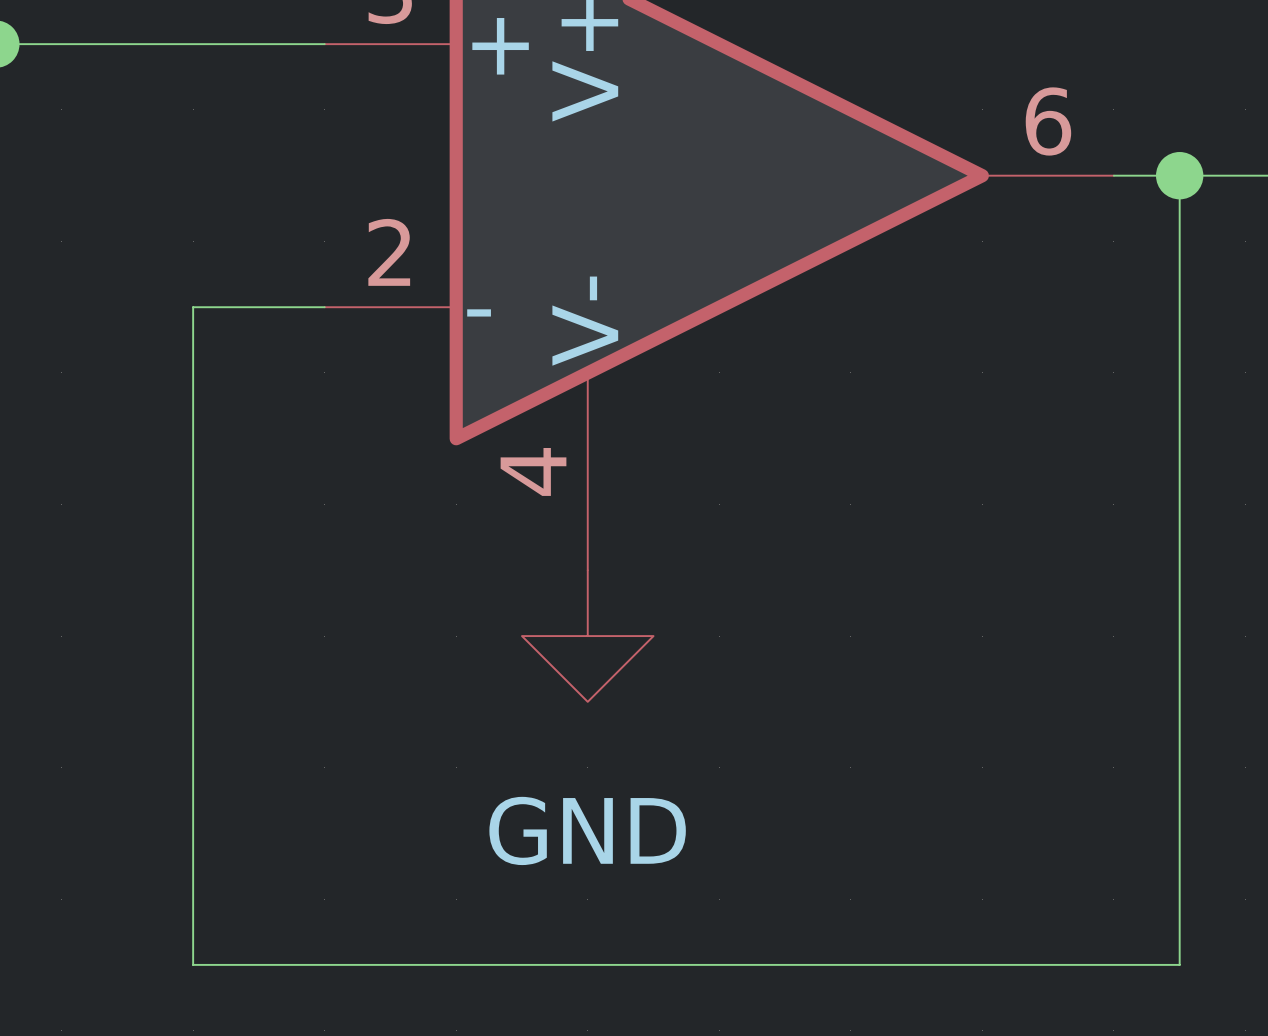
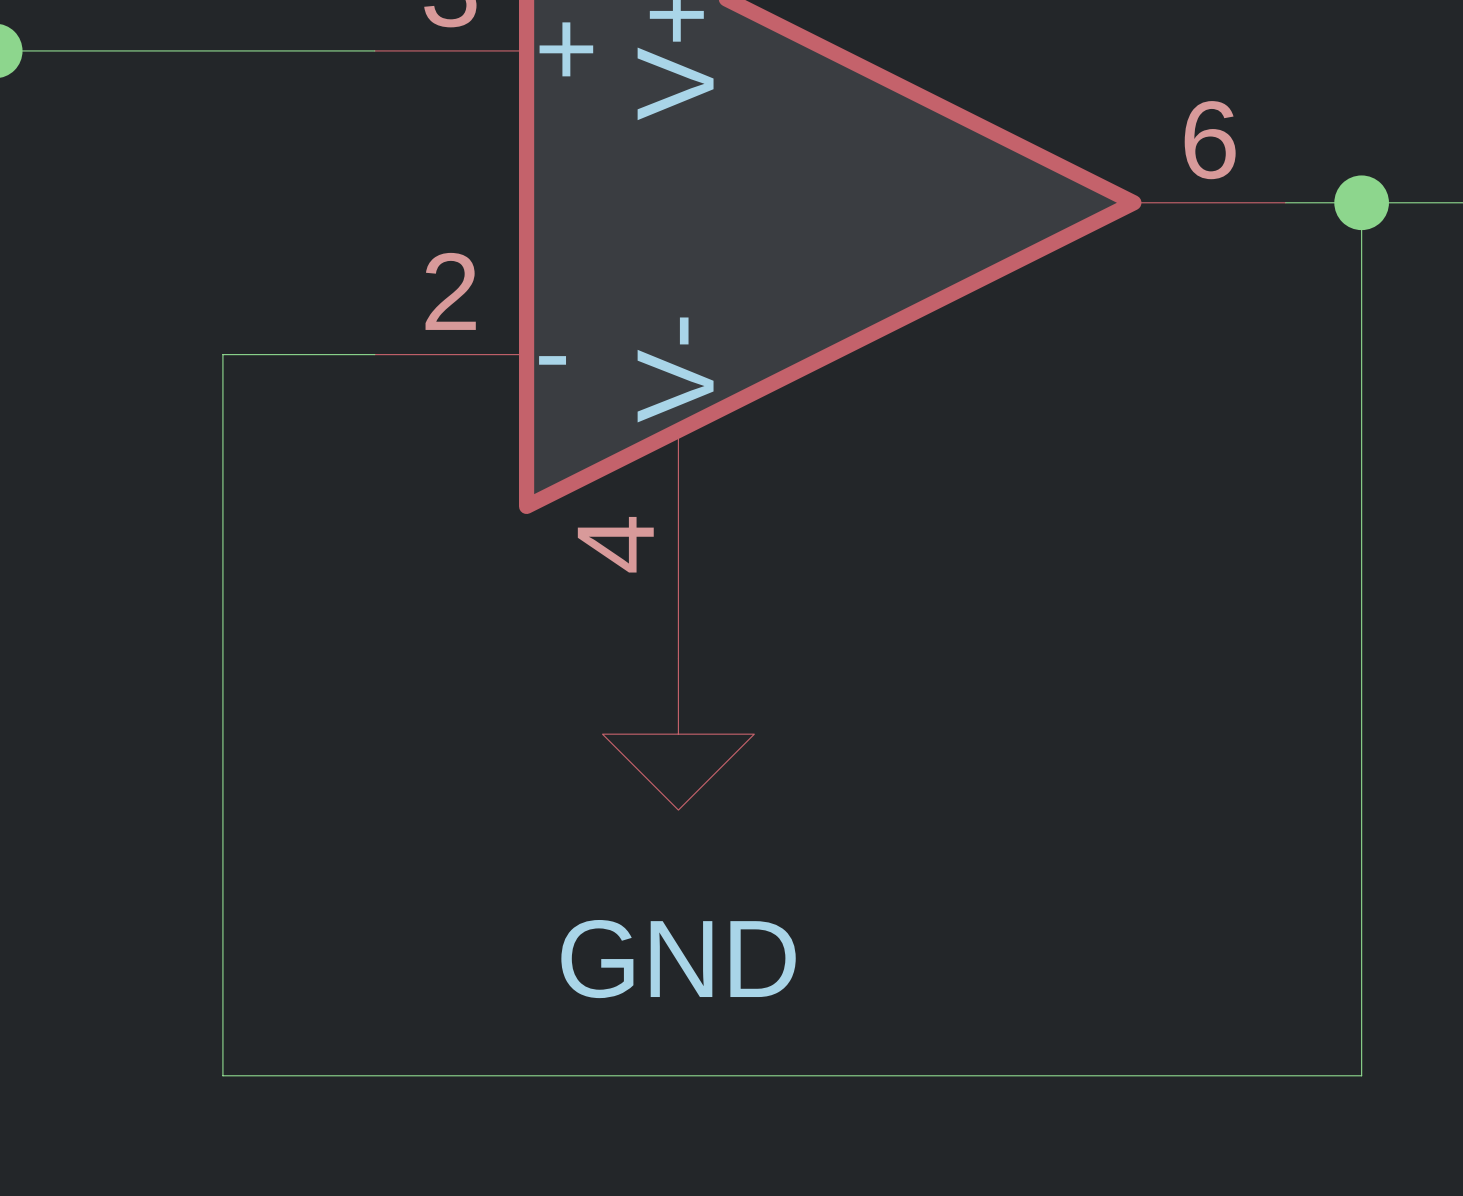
wire: (193, 932) (193, 964) (1179, 964) (1179, 932) -> (222, 1075) (1361, 1075)

